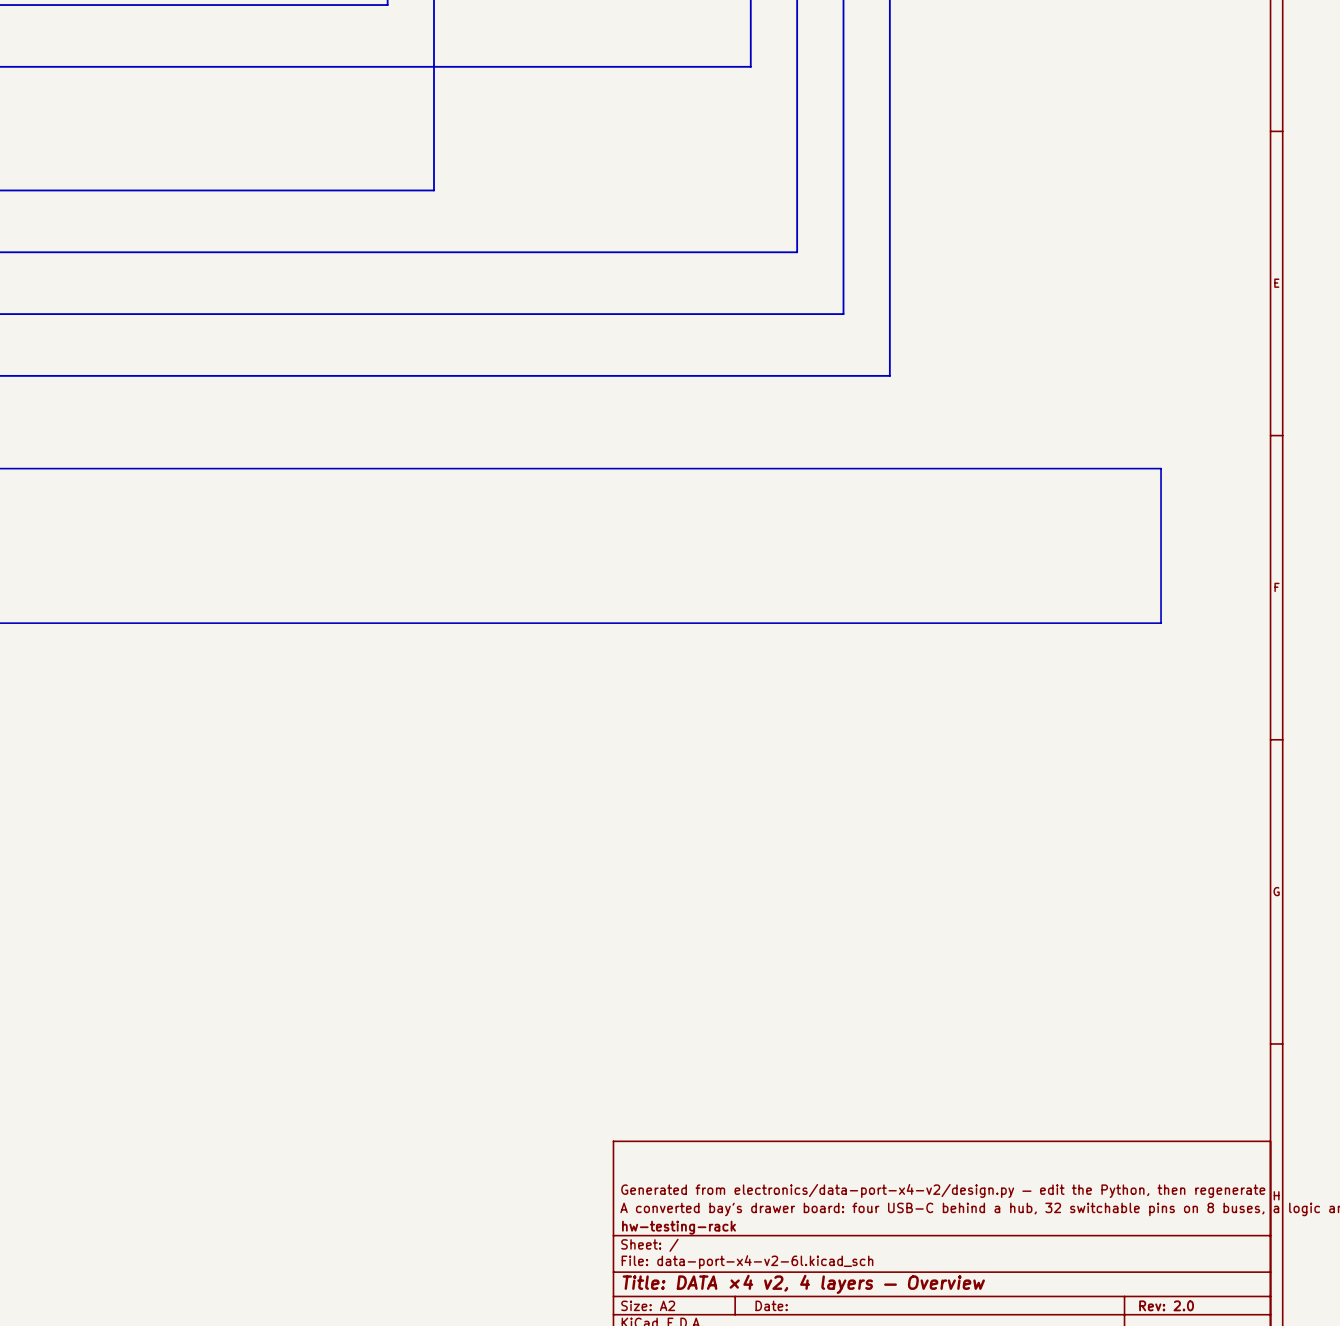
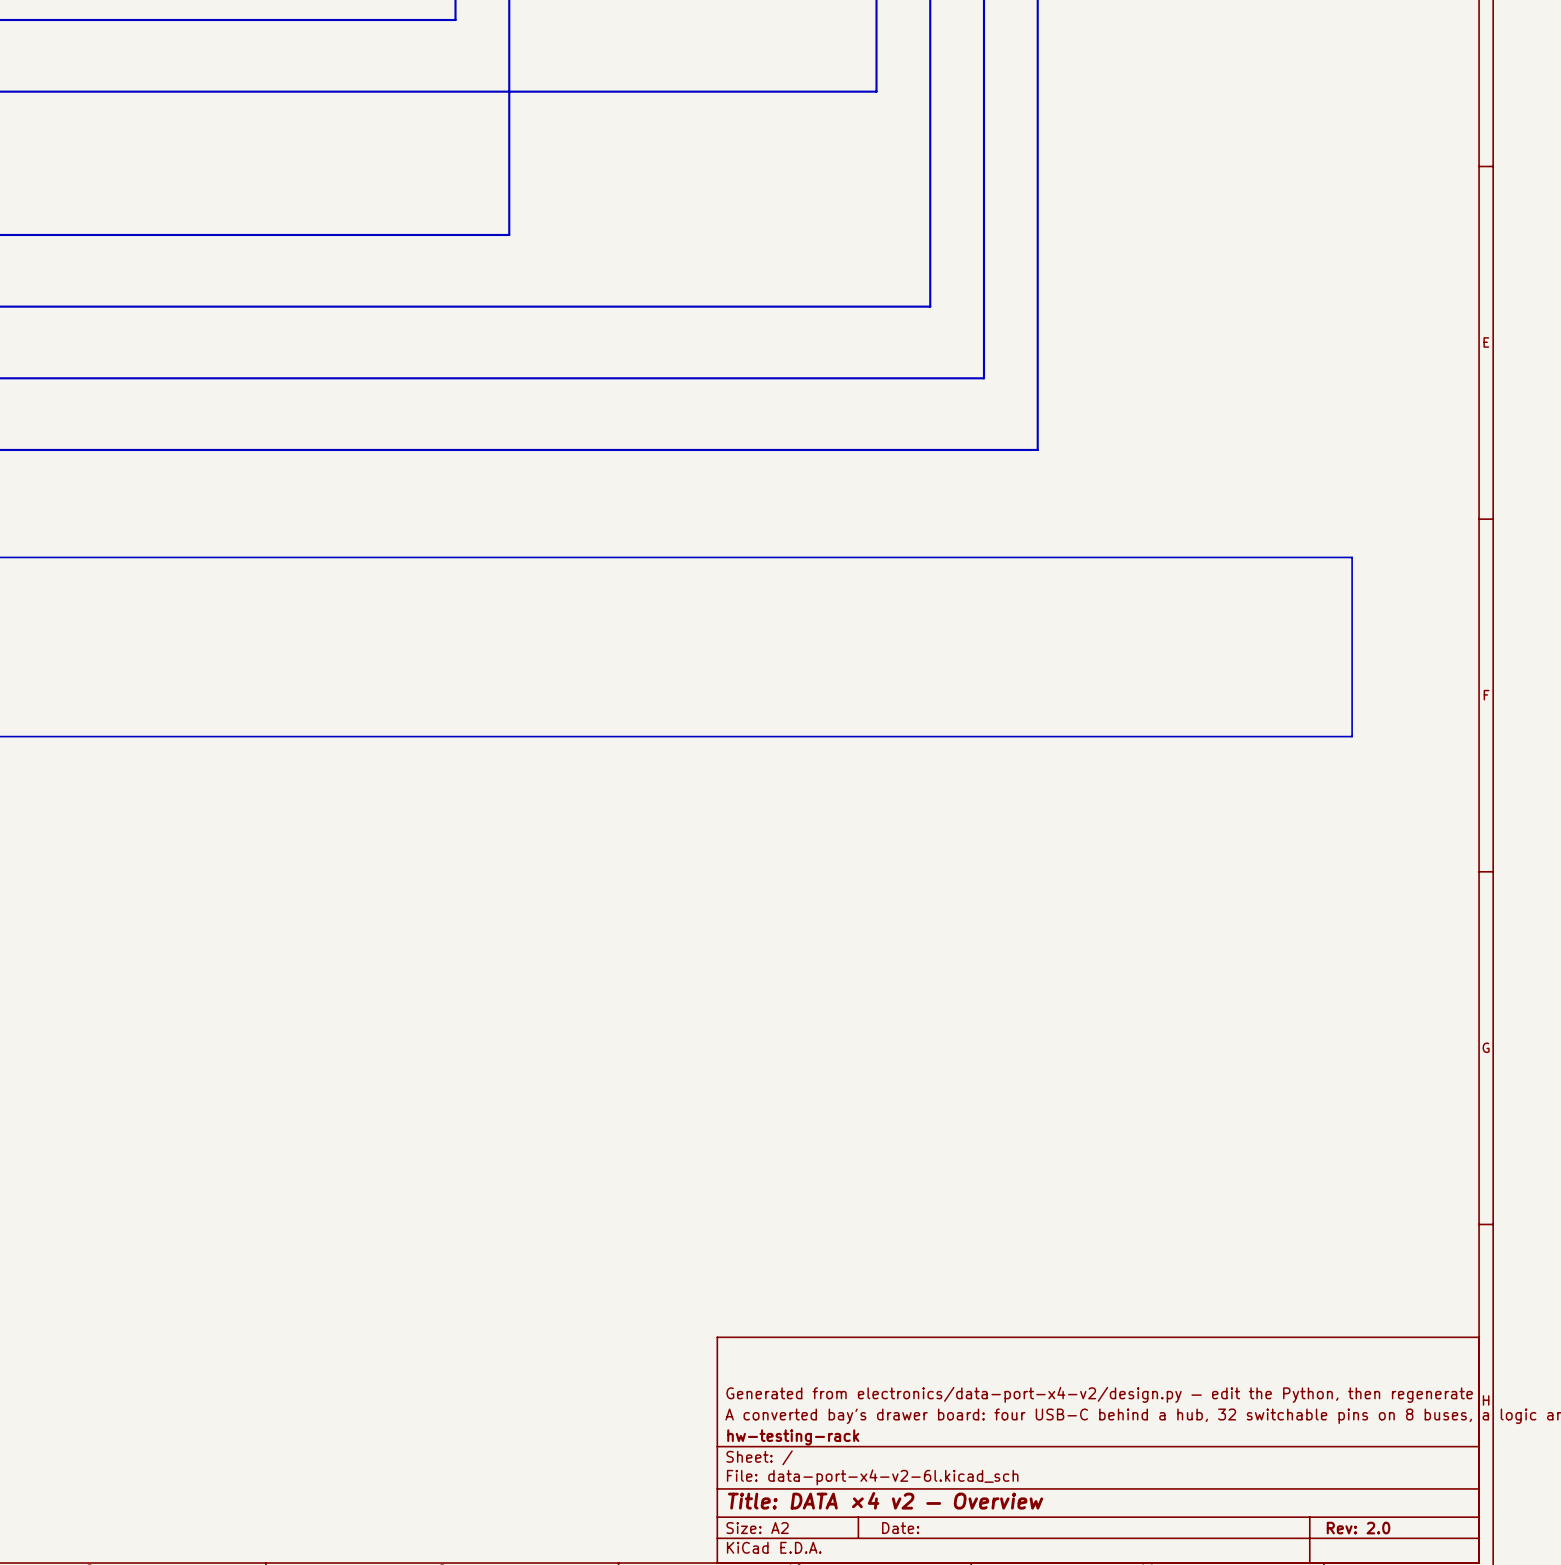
title block: Title: DATA ×4 v2, 4 layers — Overview (803, 1284) -> Title: DATA ×4 v2 — Overview (885, 1500)

